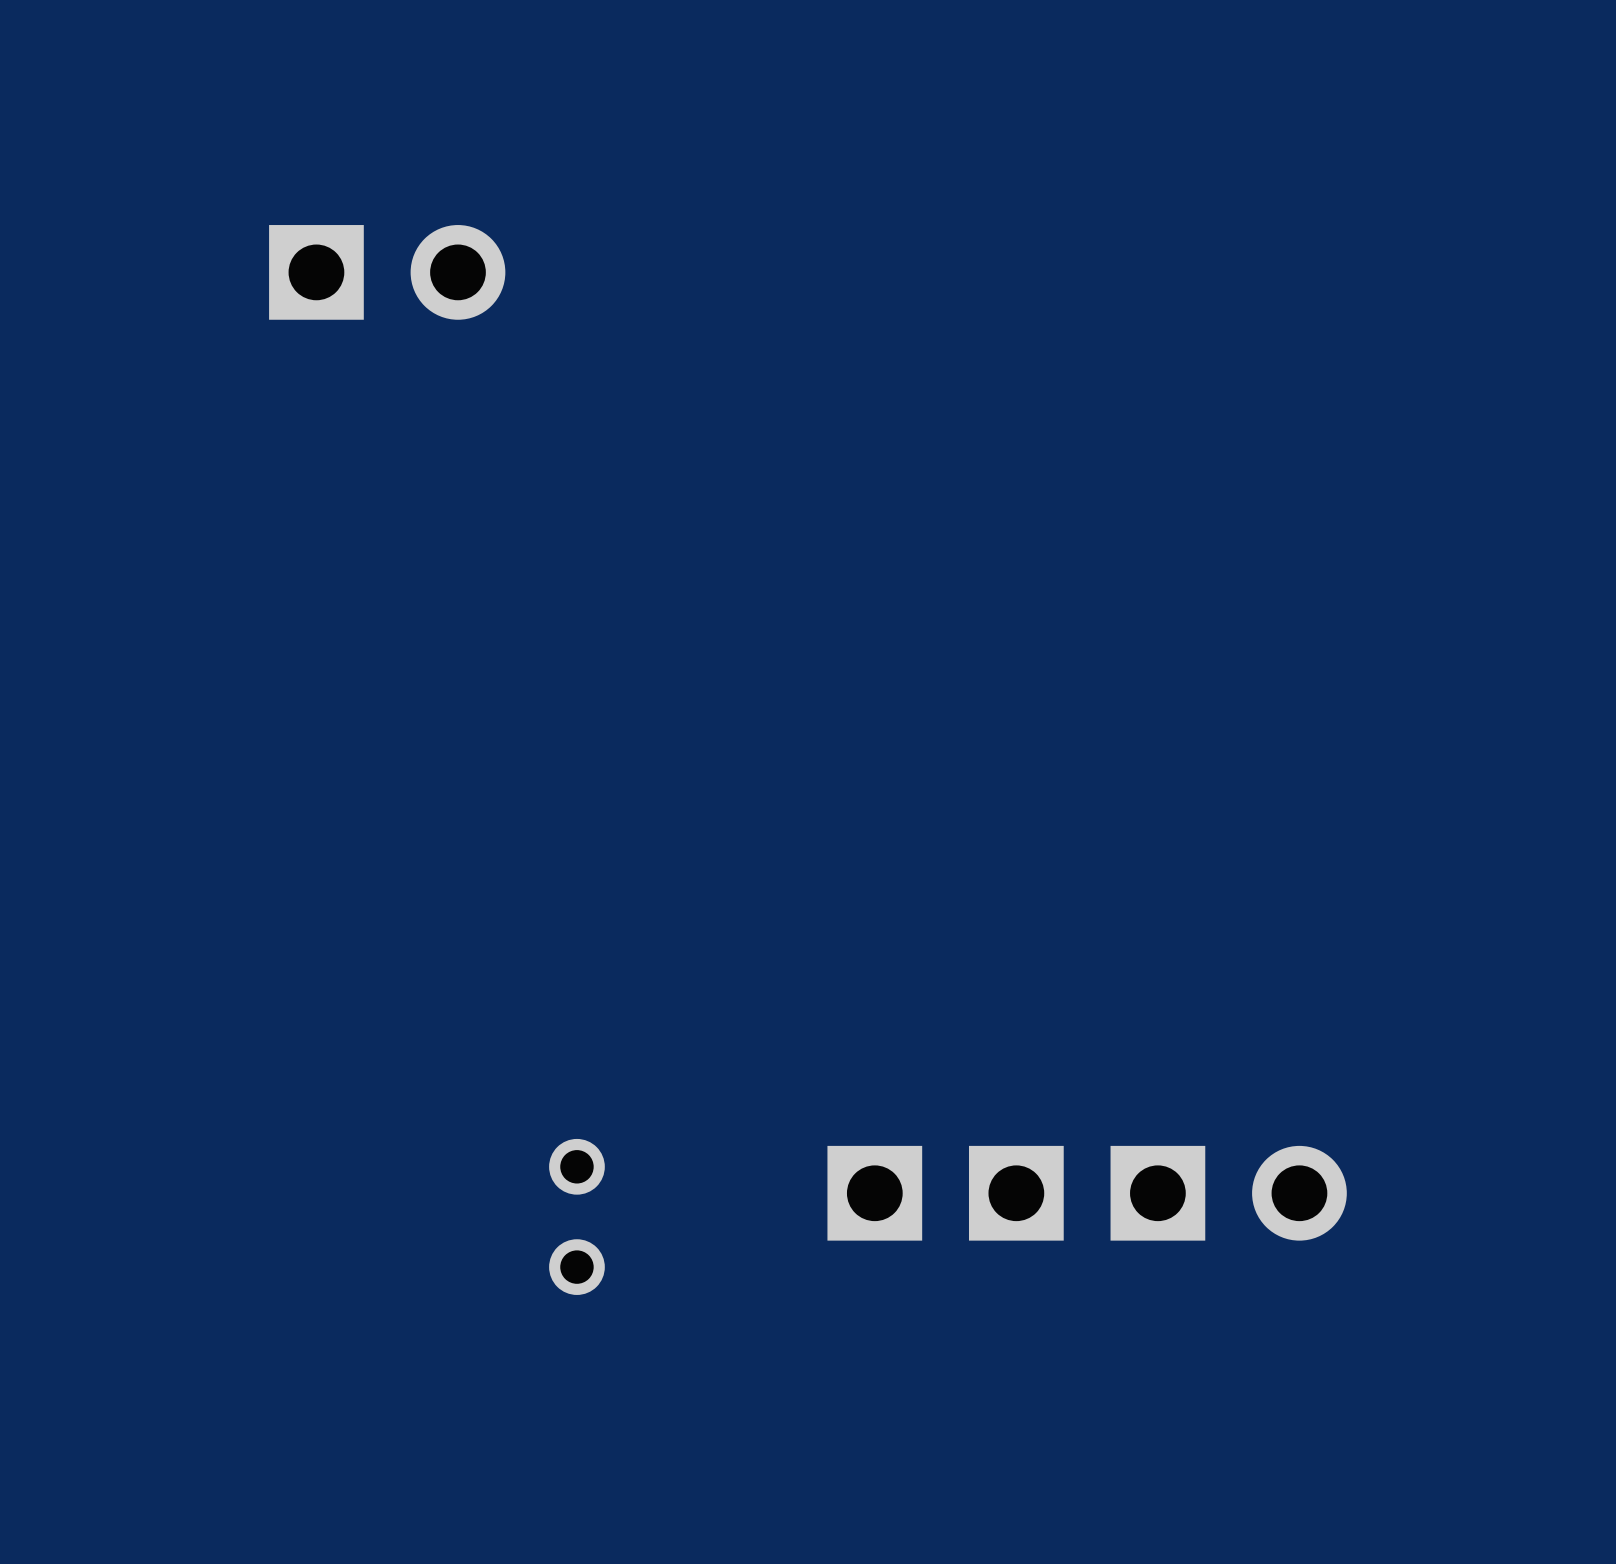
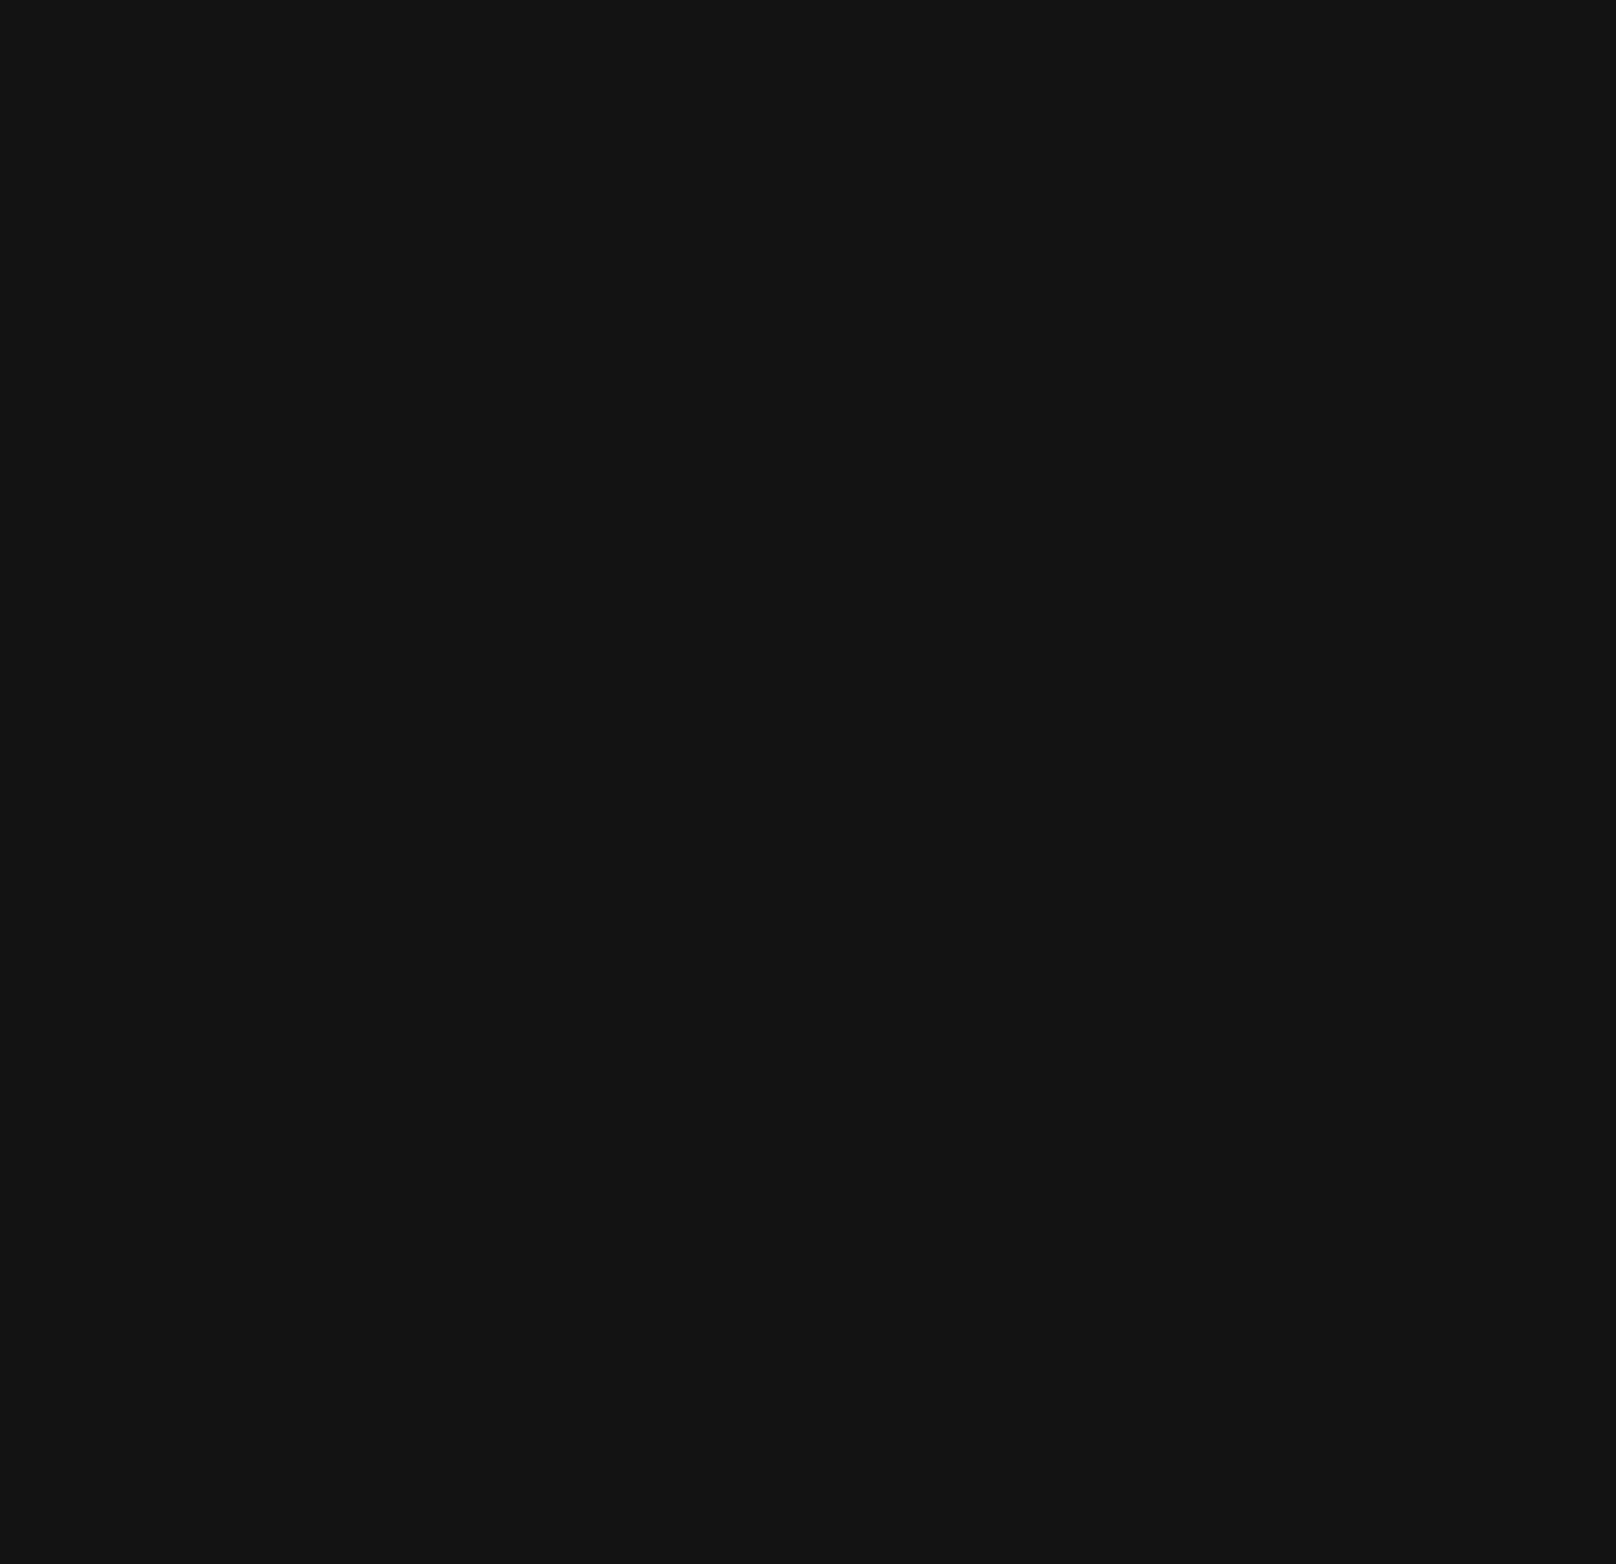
part: (387, 272) -> none
part: (1087, 1193) -> none
part: (576, 1216) -> none

